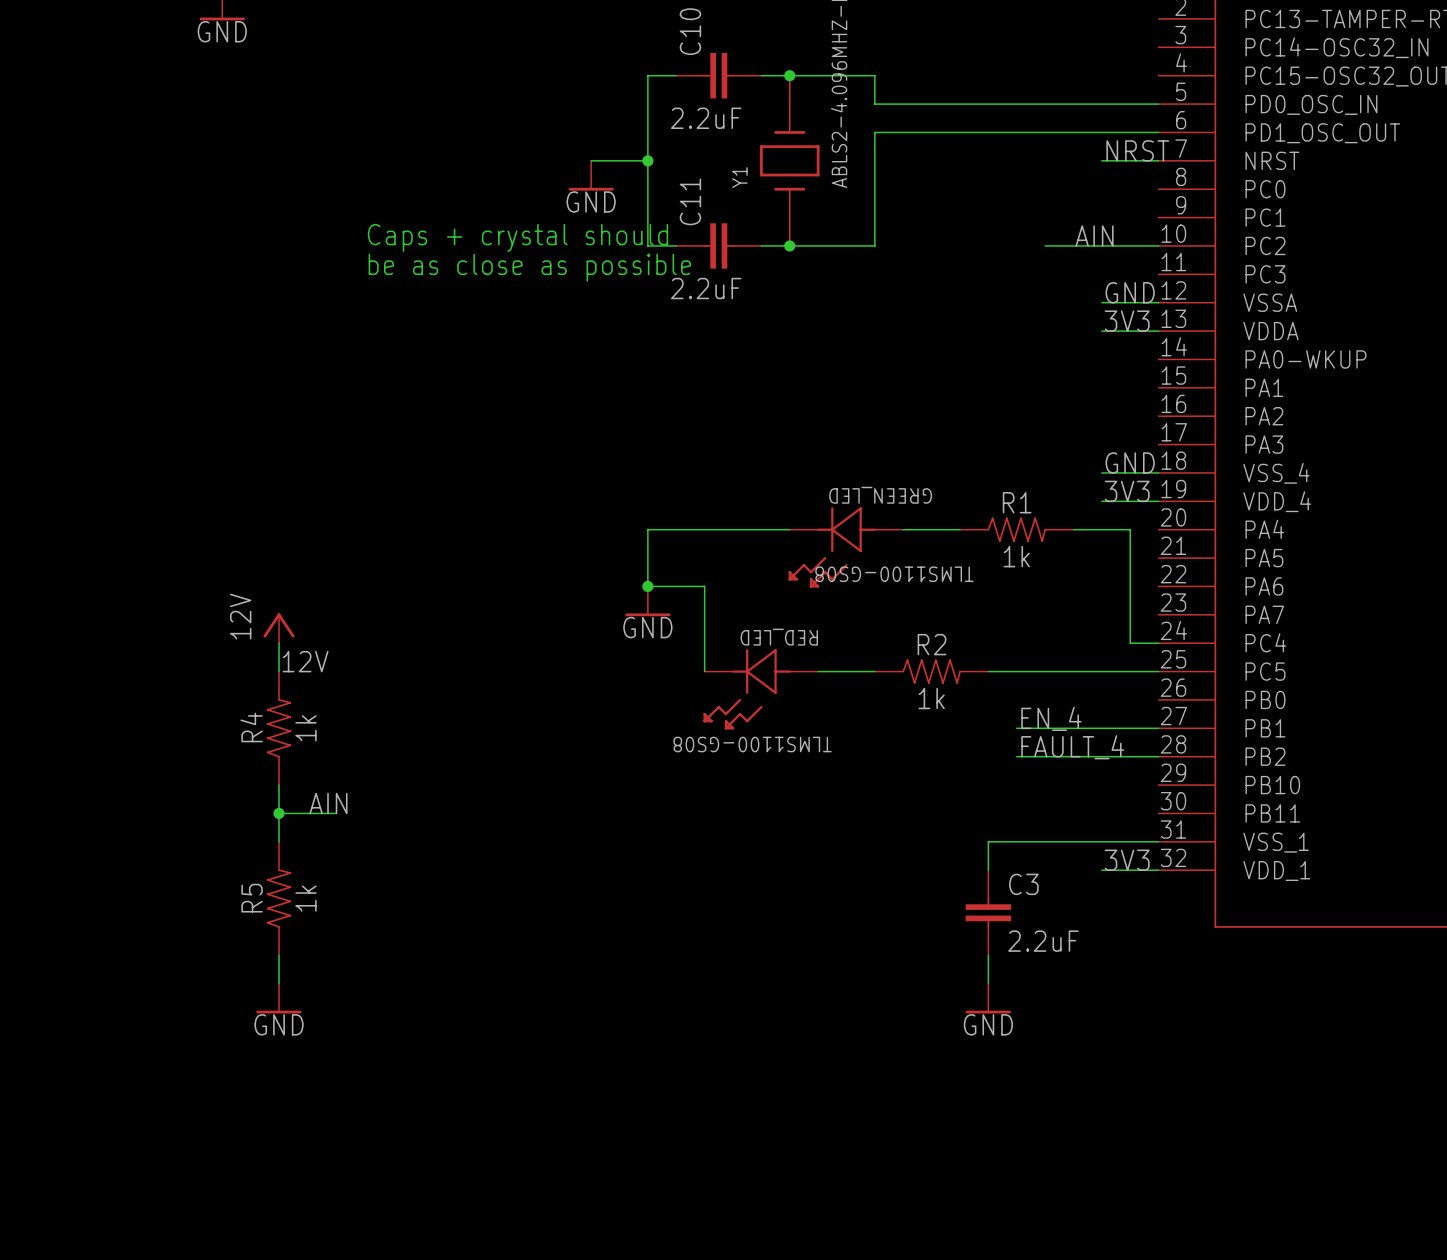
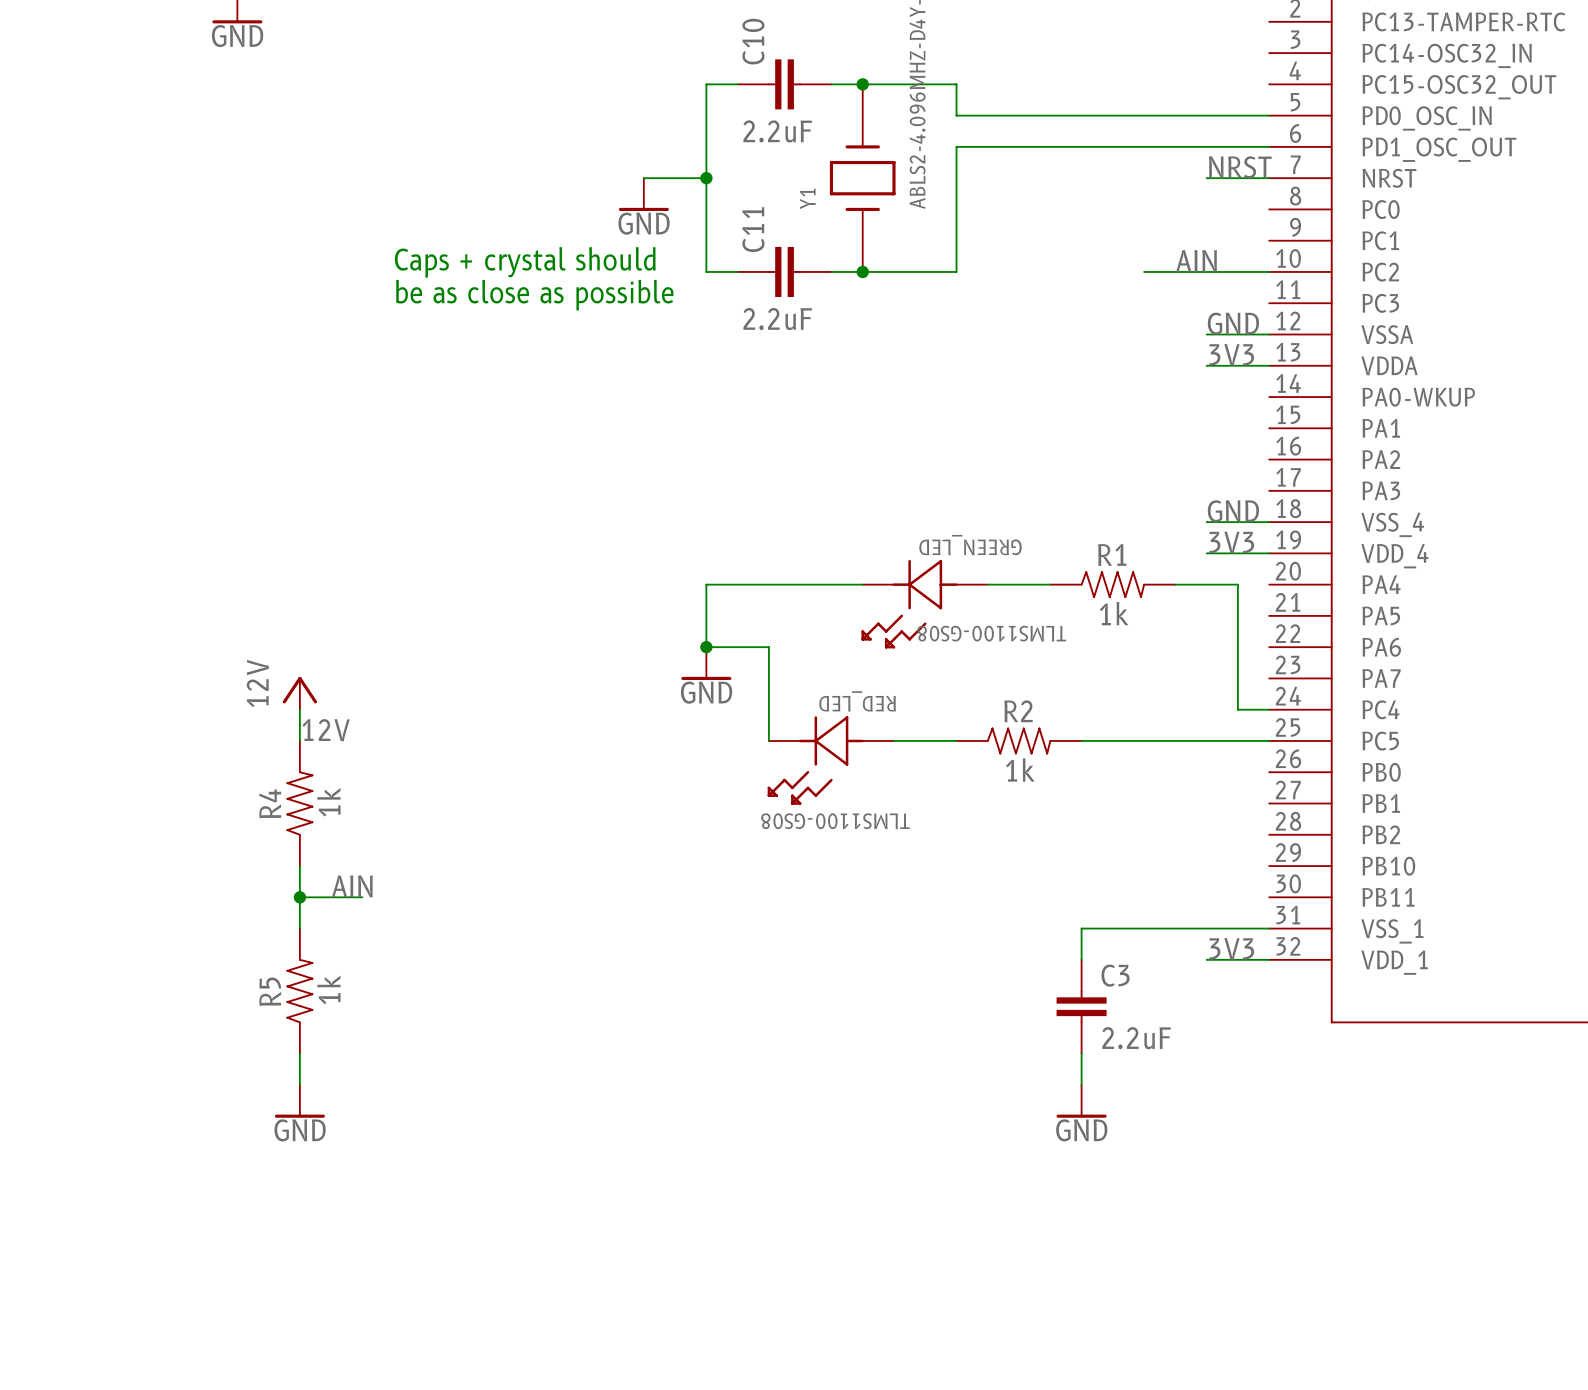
label: EN_4 (1051, 718) -> none
wire: (1016, 728) (1158, 728) -> none
label: FAULT_4 (1072, 747) -> none
wire: (1016, 756) (1158, 756) -> none

